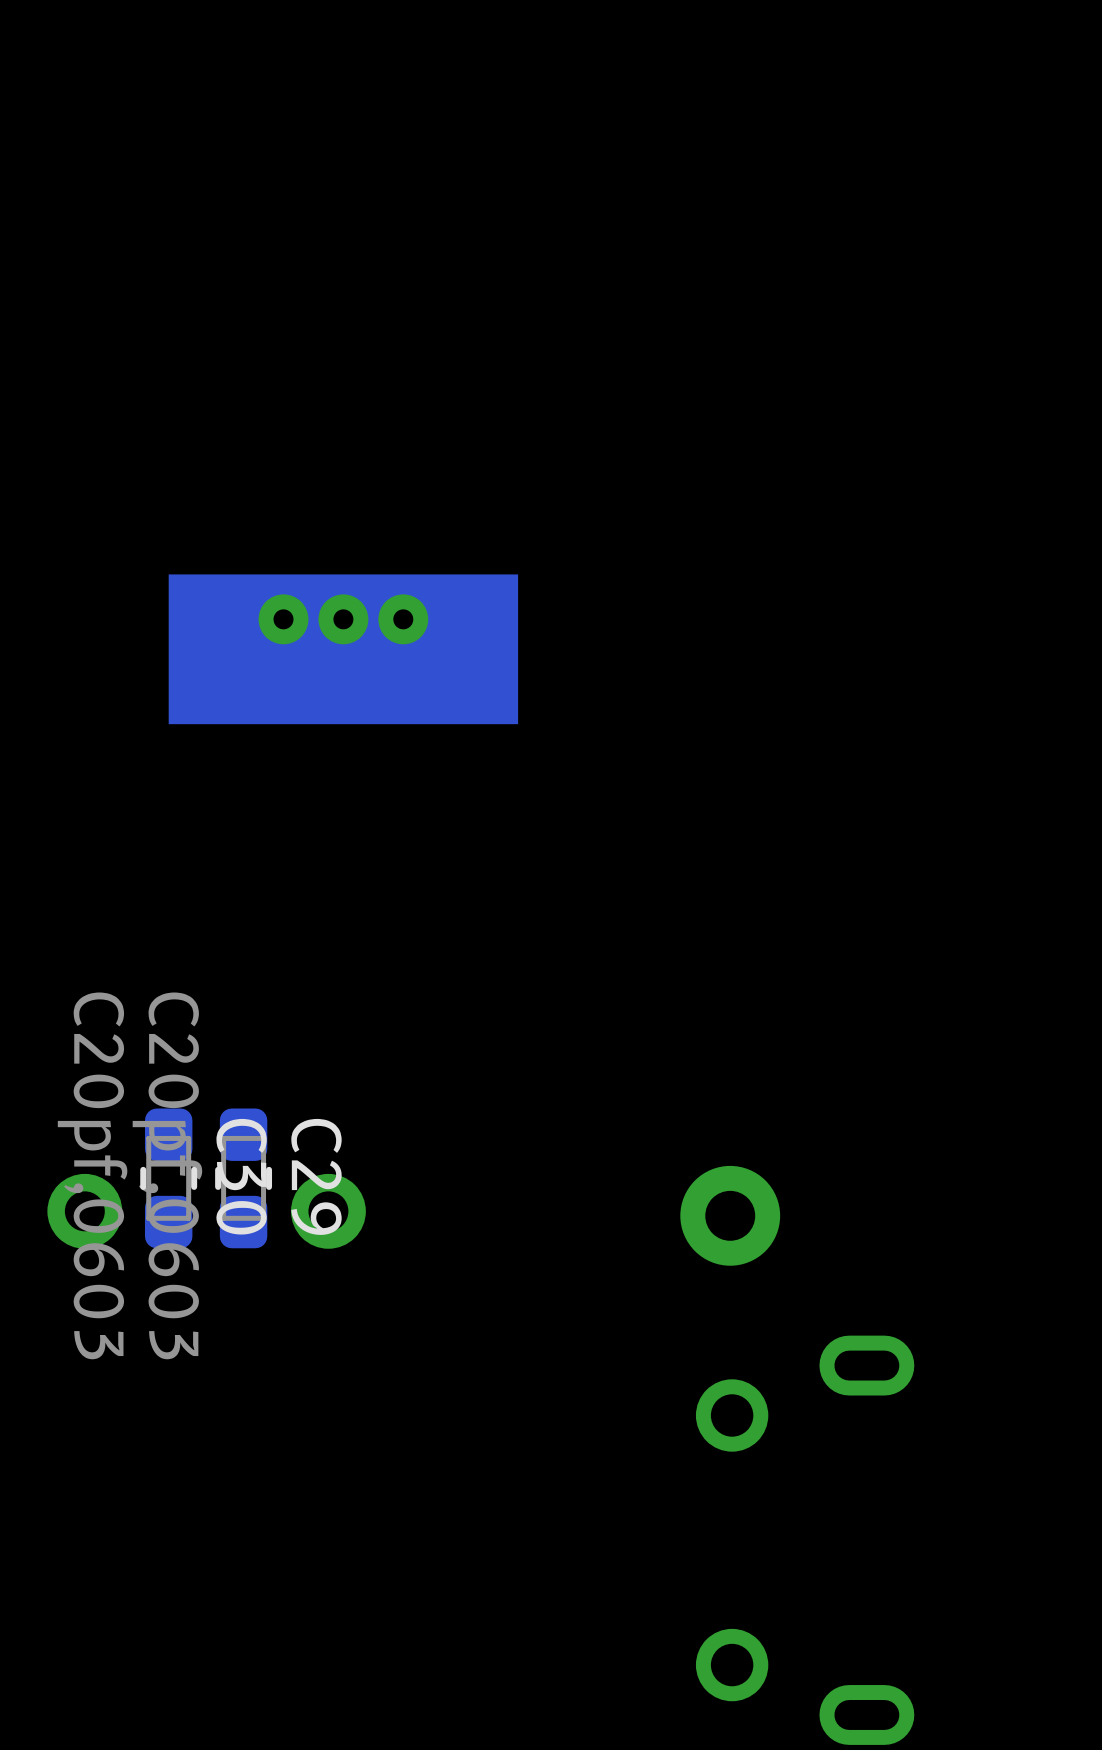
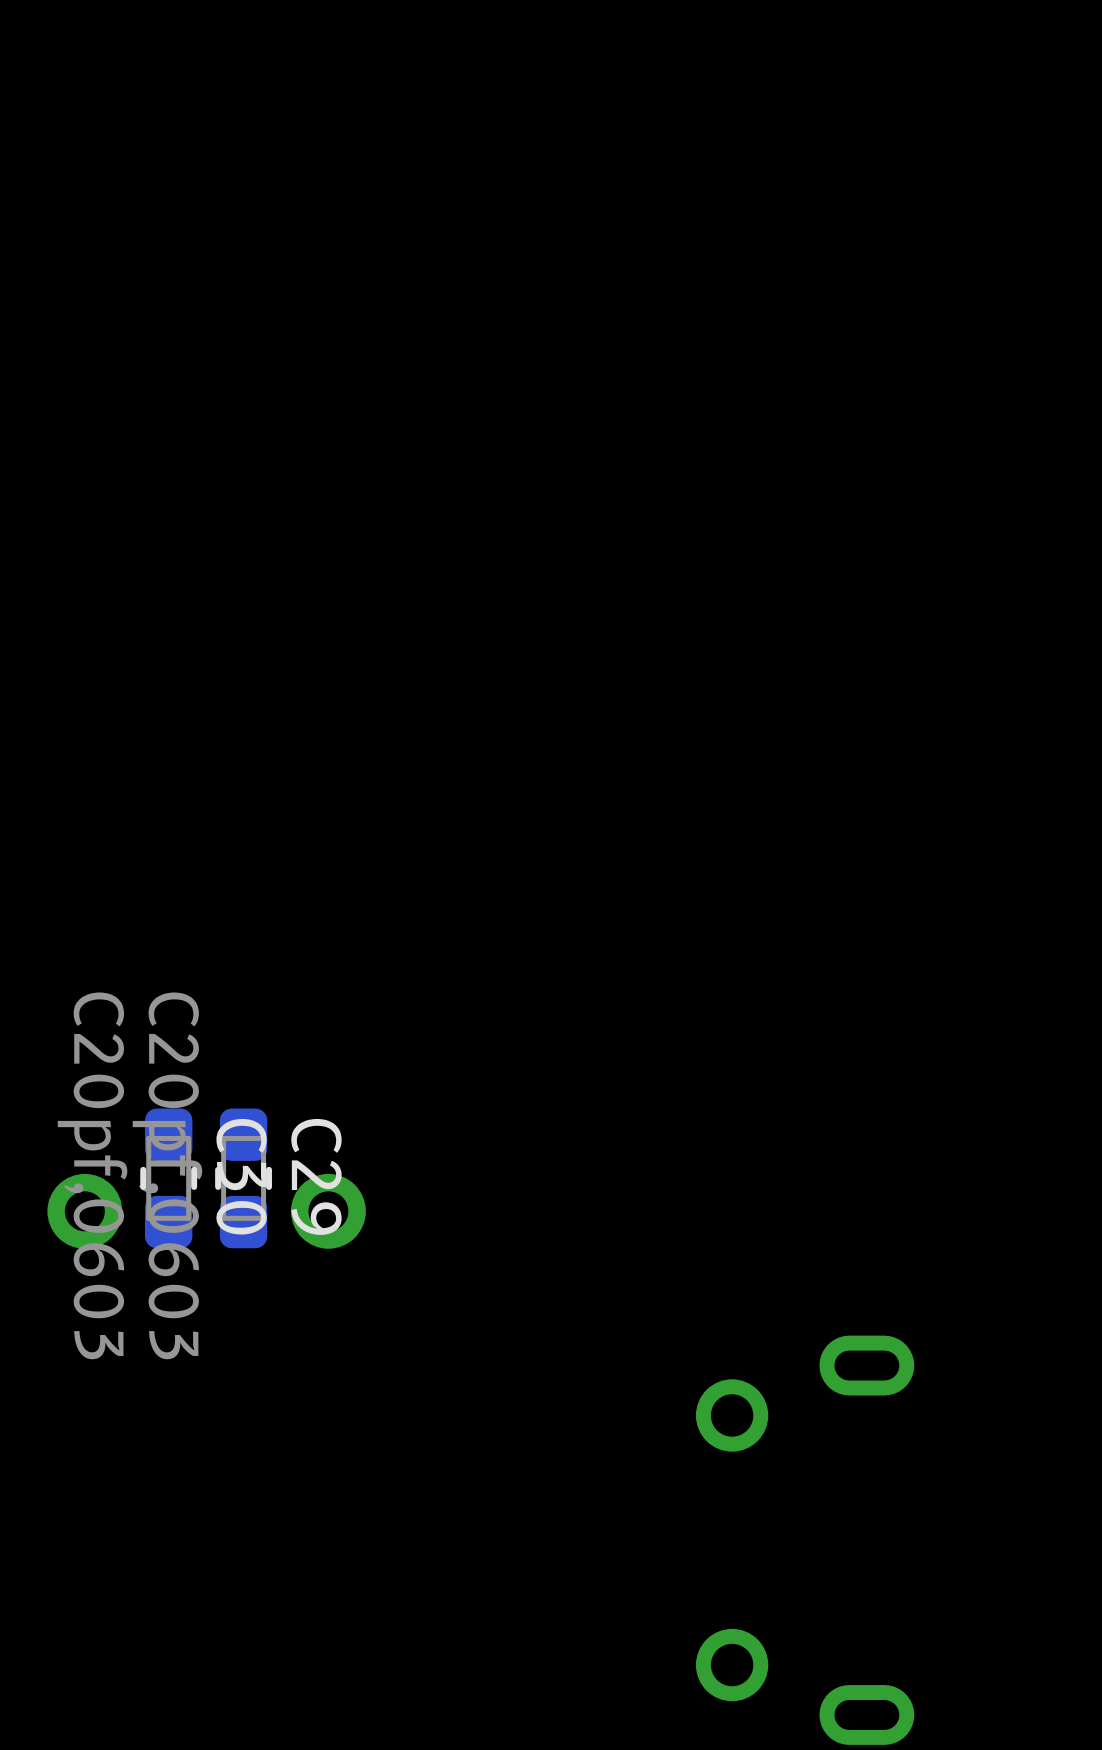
part: (343, 649) -> none
part: (730, 1215) -> none

